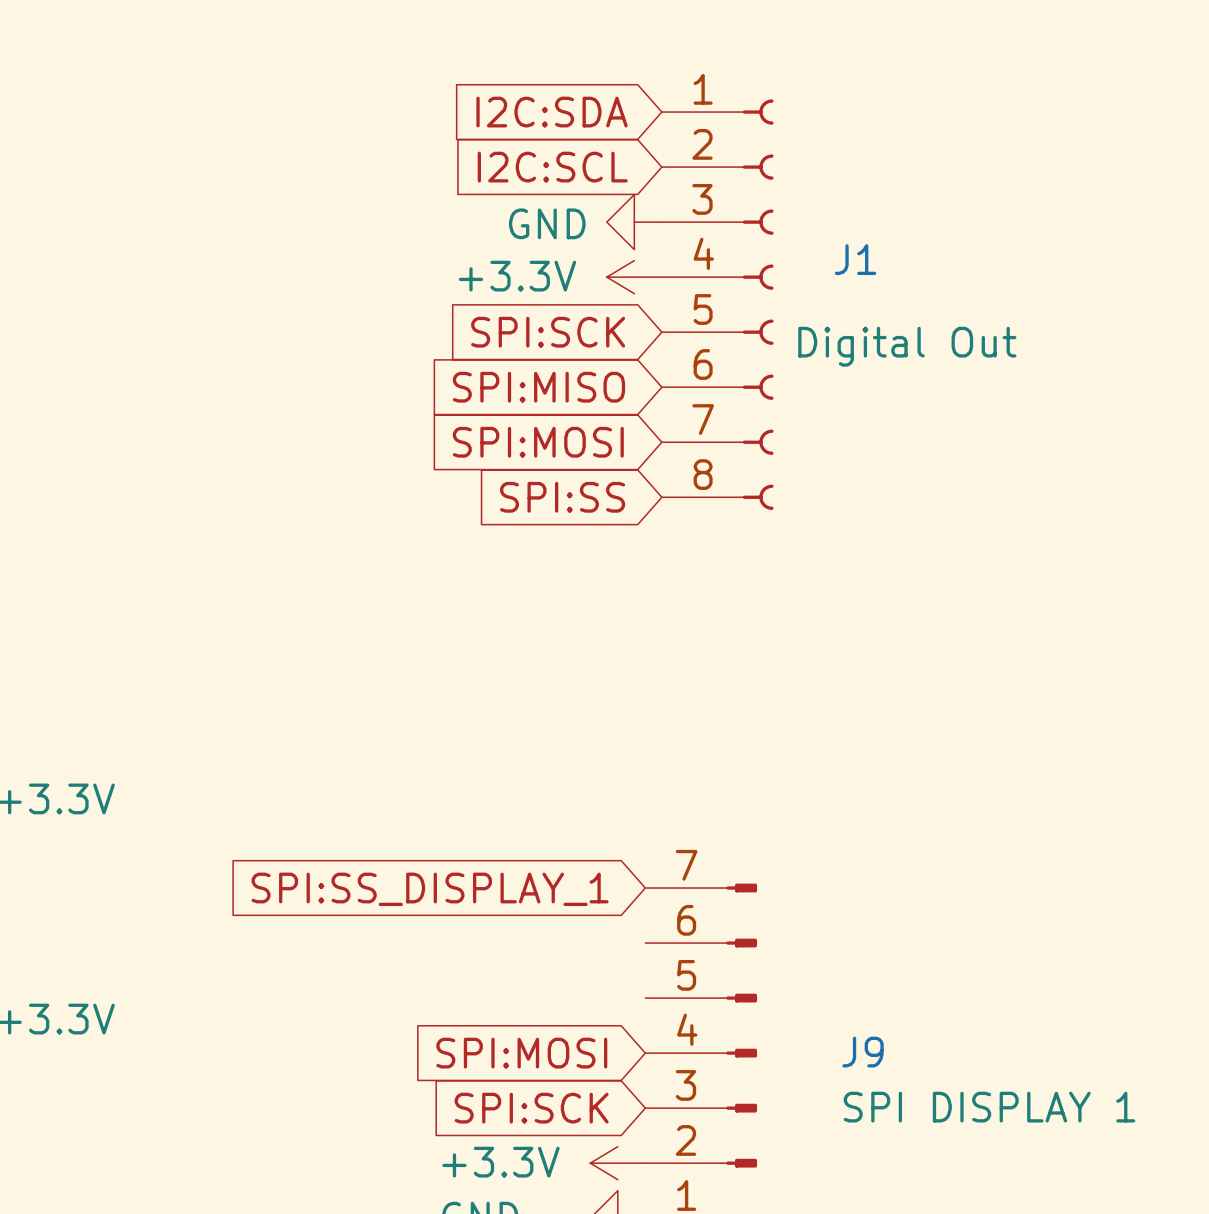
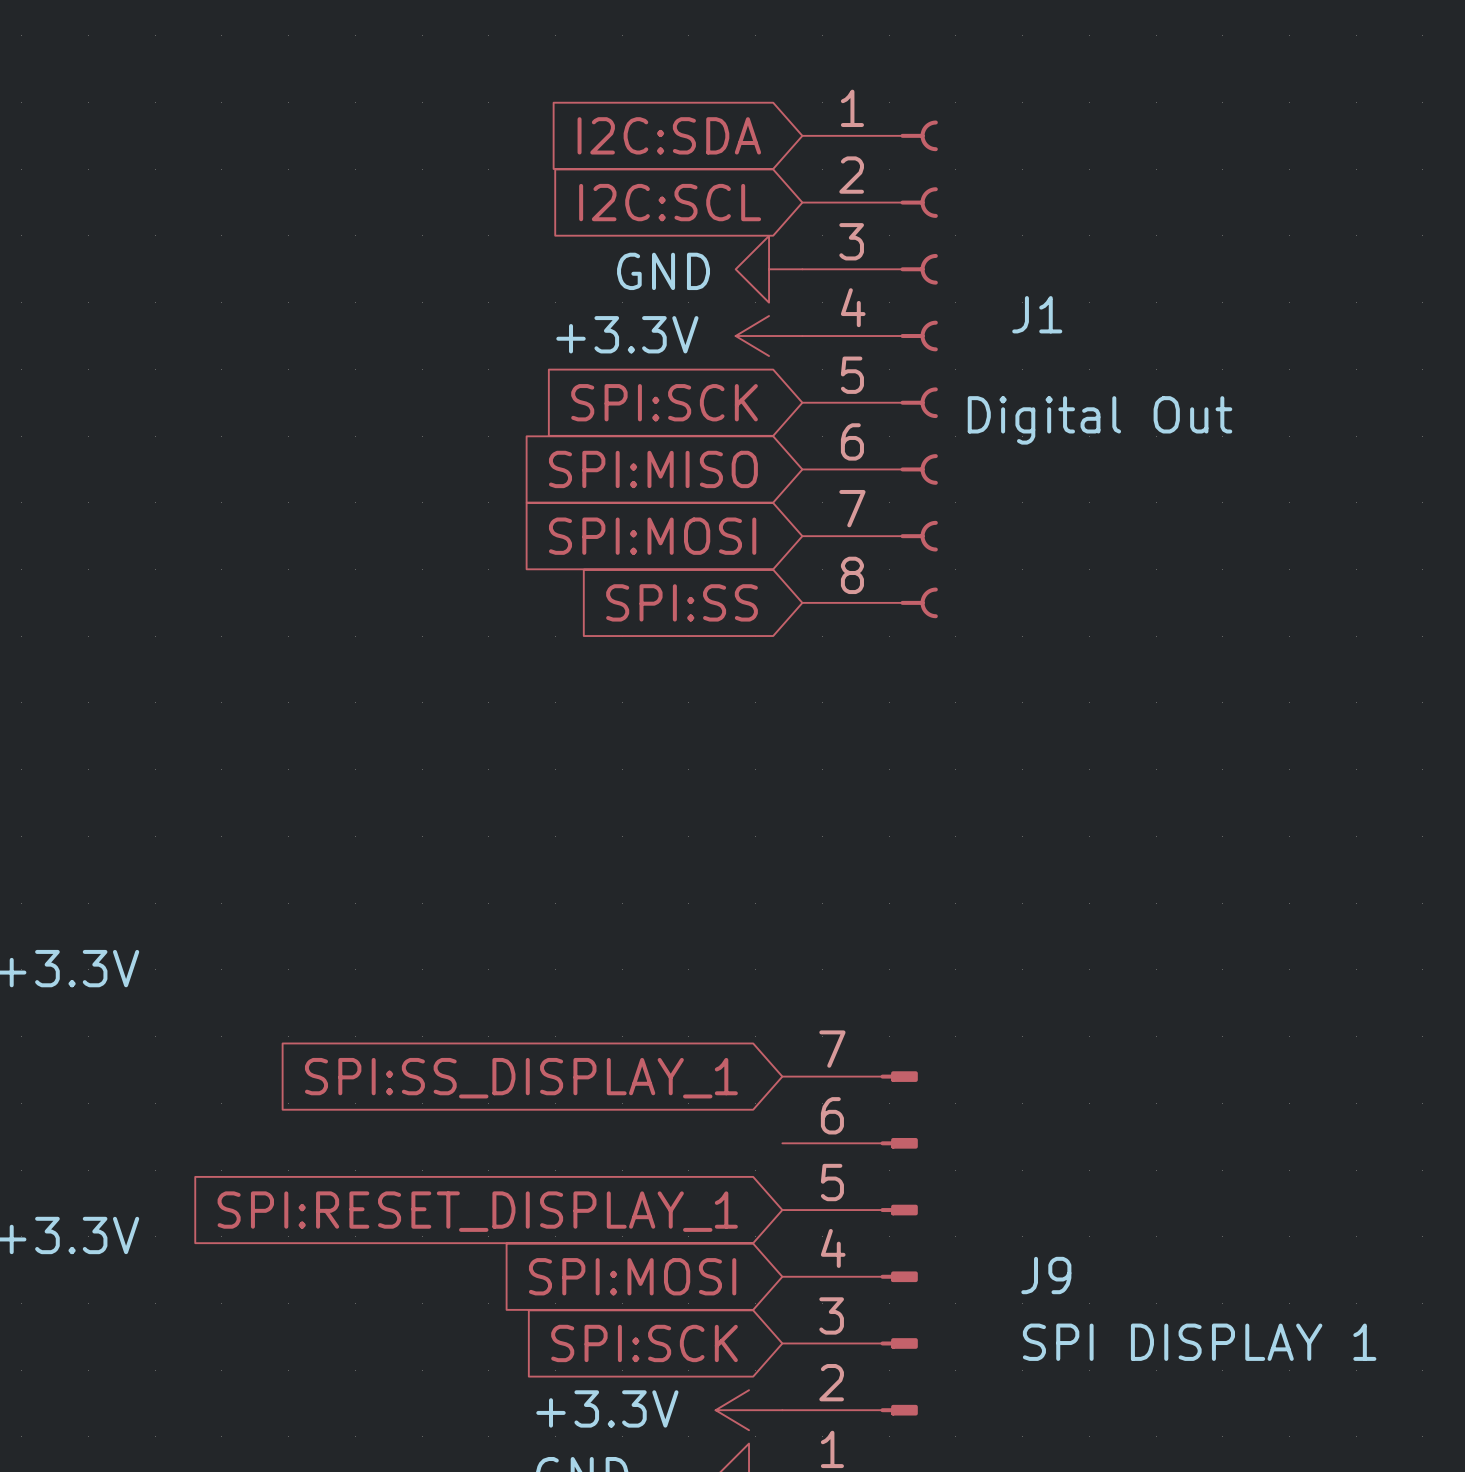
global label: none -> SPI:RESET_DISPLAY_1 (477, 1211)

